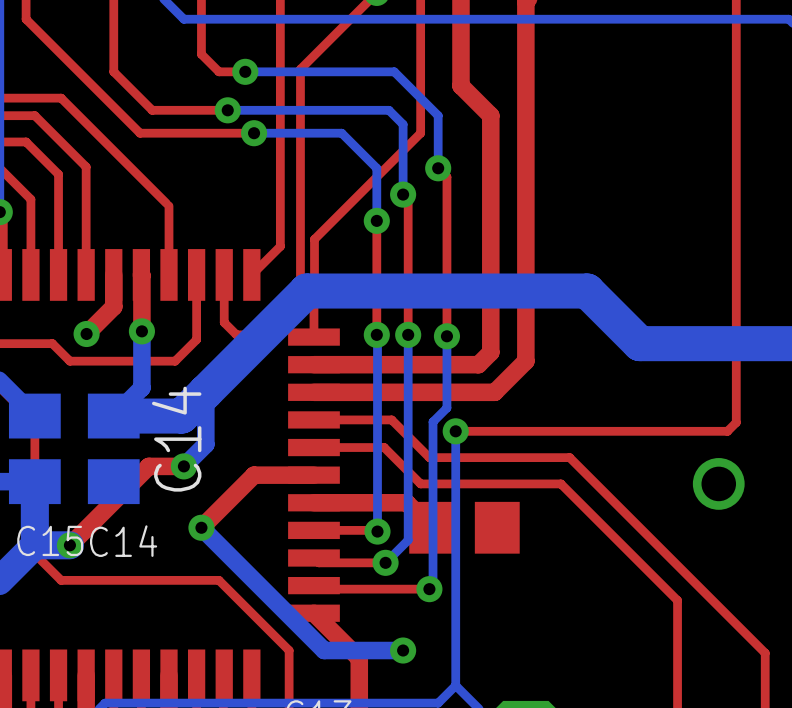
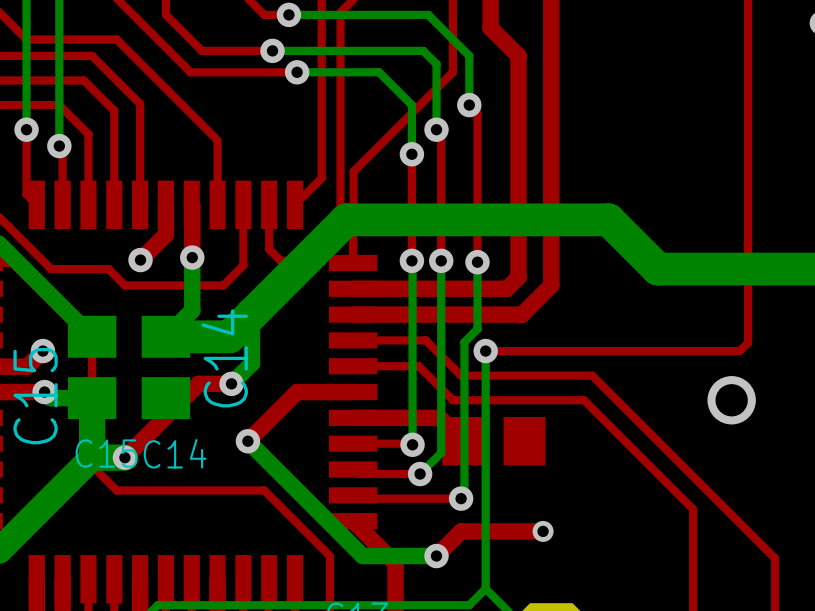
top track: none -> (543, 531) (461, 531) (436, 556)
via: none -> (543, 531)

